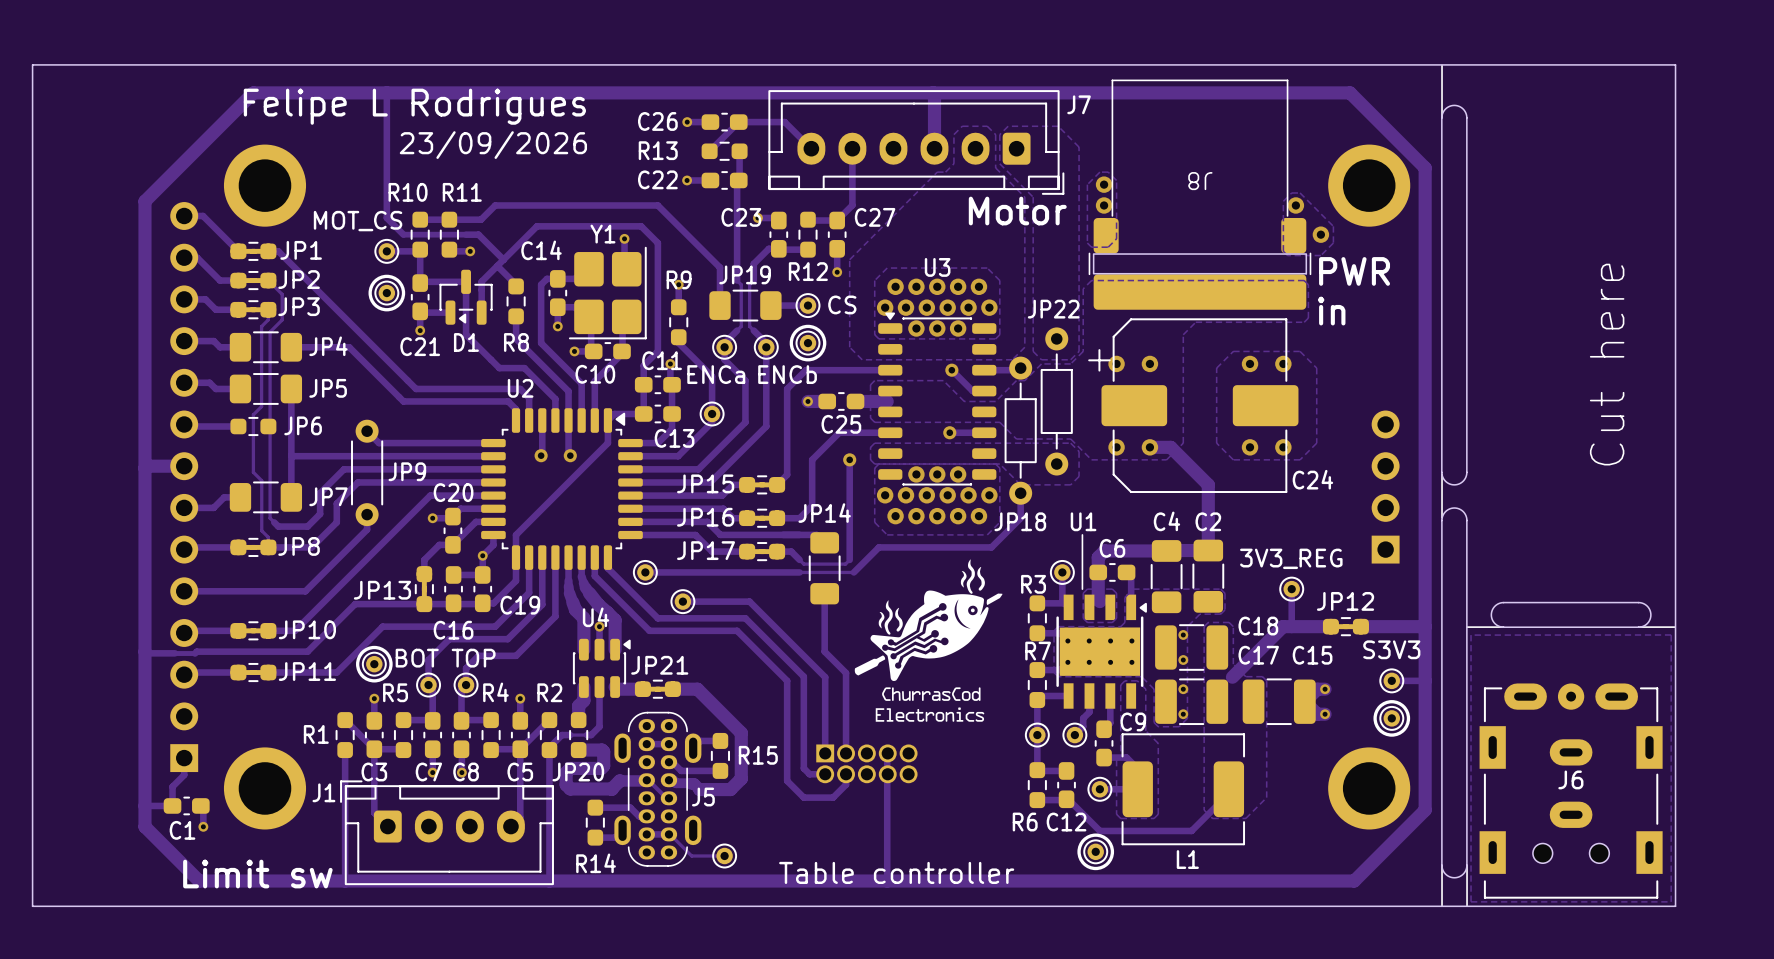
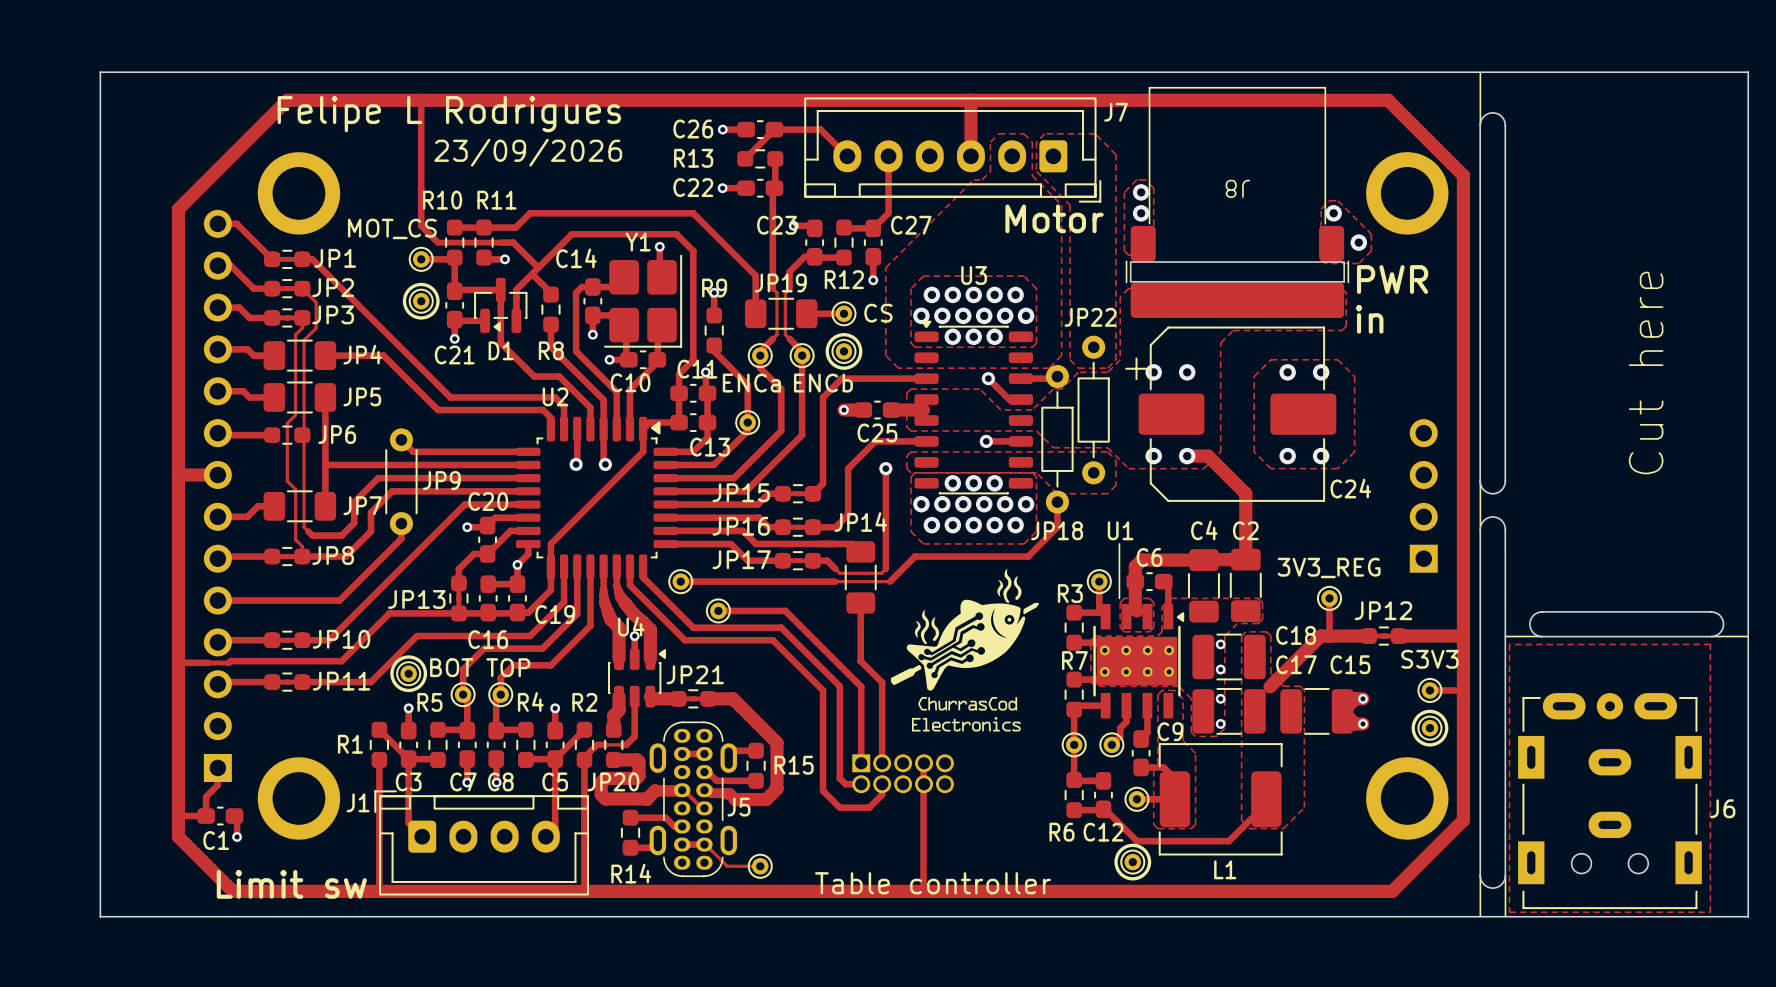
board edge: (67, 64) (32, 64) (32, 906) (67, 906) -> (100, 72) (100, 916)
board edge: (1675, 64) (1675, 906) -> (1714, 72) (1748, 72) (1748, 916) (1714, 916)
board edge: (1638, 602) (1647, 606) (1650, 614) (1647, 623) (1638, 627) -> (1677, 611) (1714, 612) (1720, 616) (1723, 624) (1720, 631) (1714, 636) (1677, 636)
line: (1639, 627) (1673, 627) -> (1713, 636) (1747, 636)
J6 name position: J6 (1570, 779) -> J6 (1722, 808)

